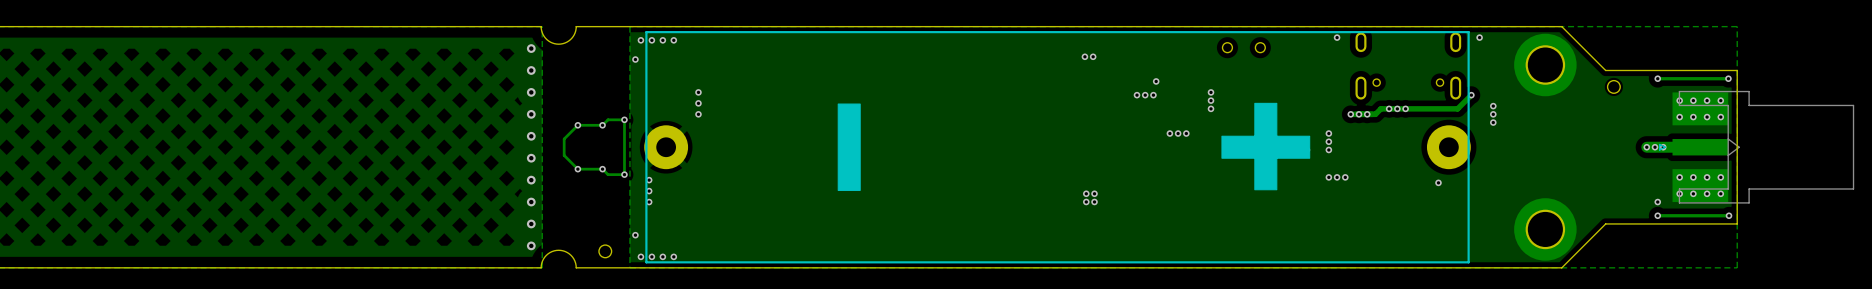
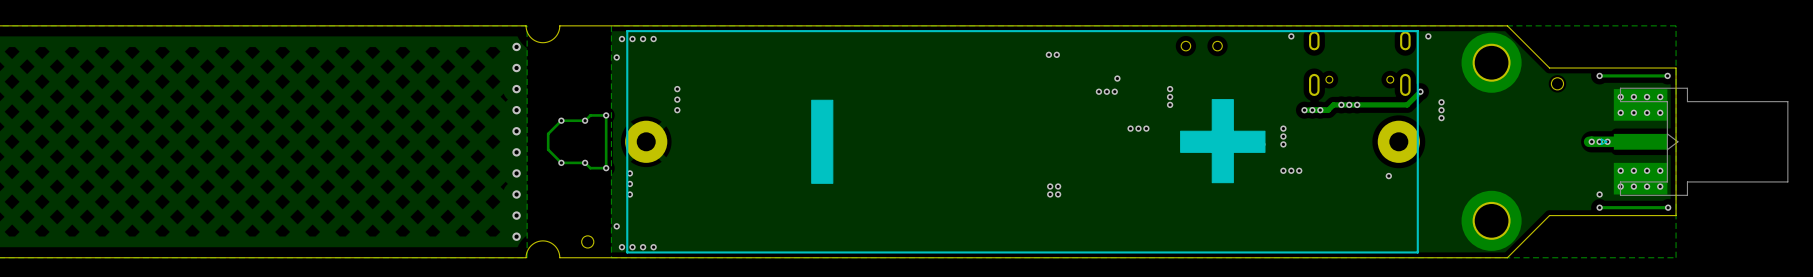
via: (1646, 147) -> none
via: none -> (1591, 141)
via: (1655, 147) -> none
via: none -> (1599, 141)
via: (1663, 147) -> none
via: none -> (1607, 141)

